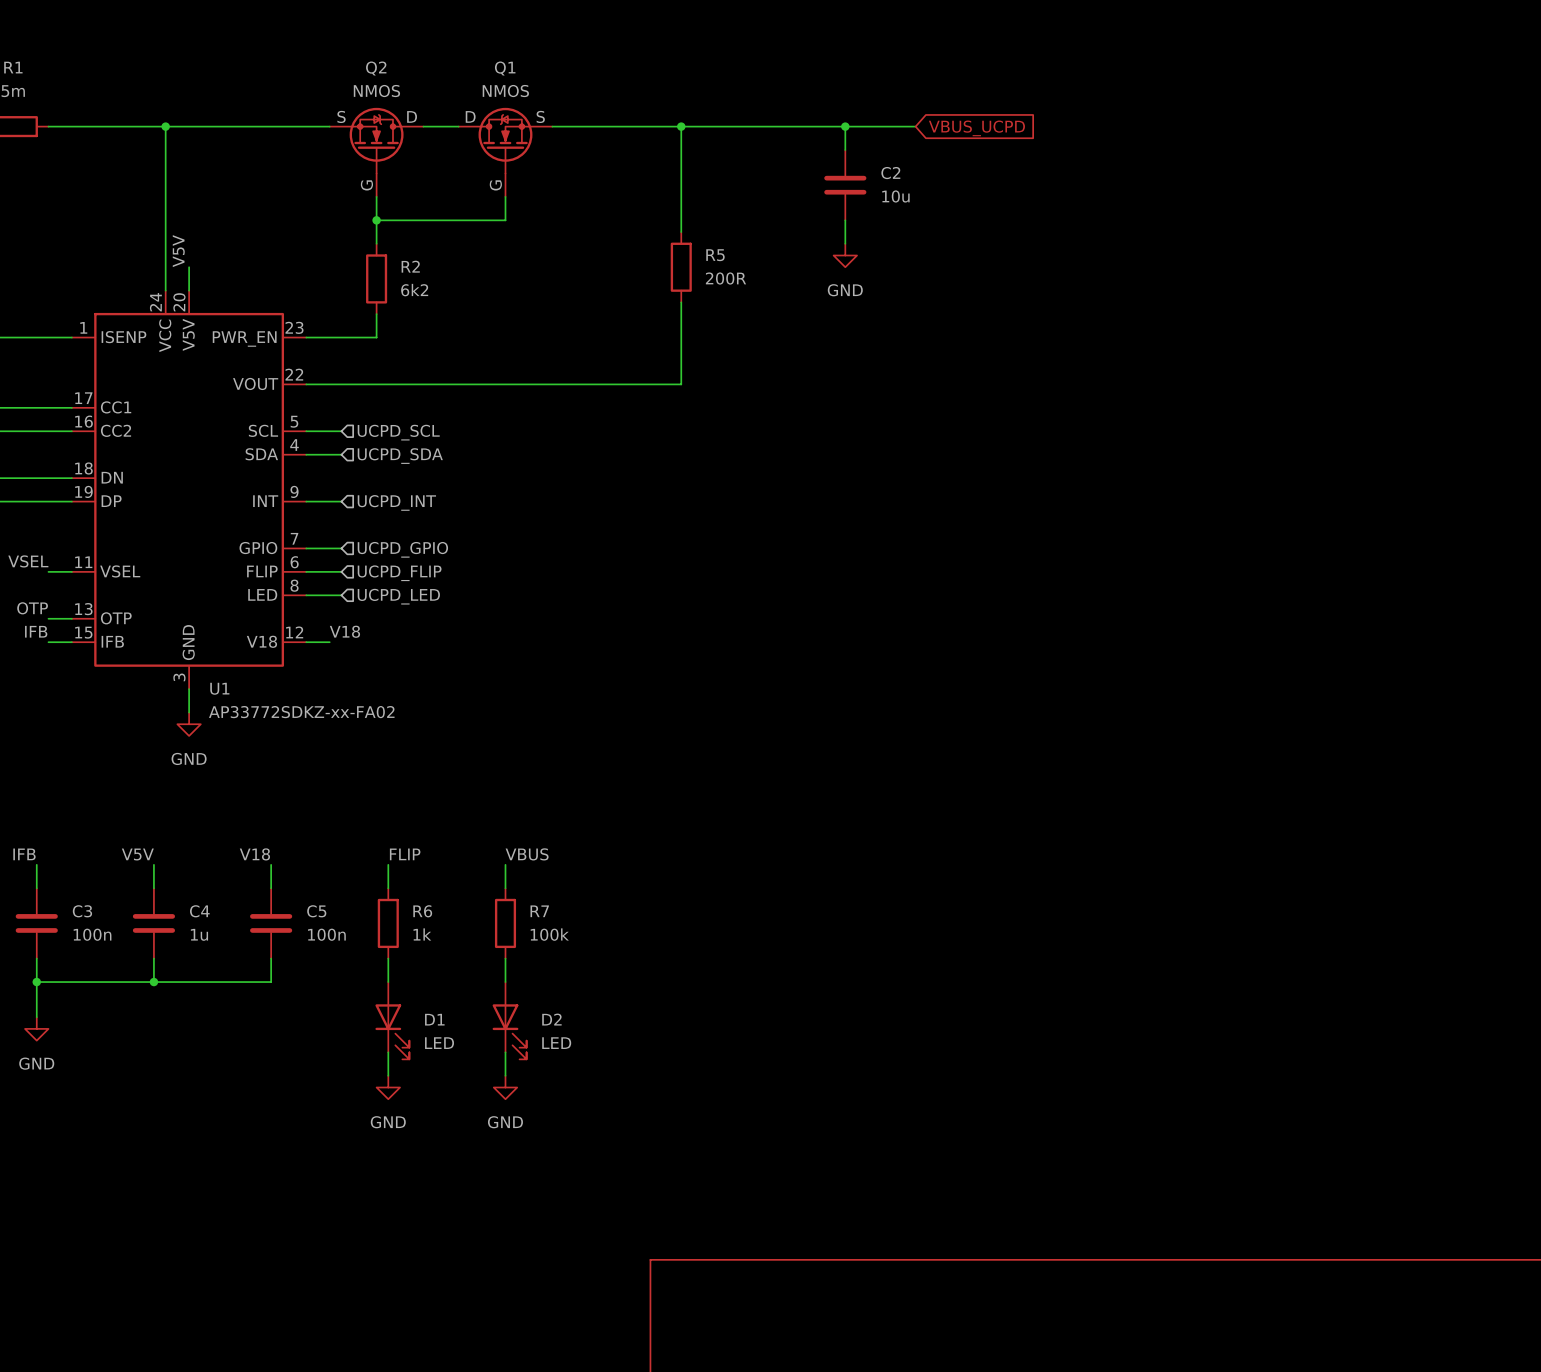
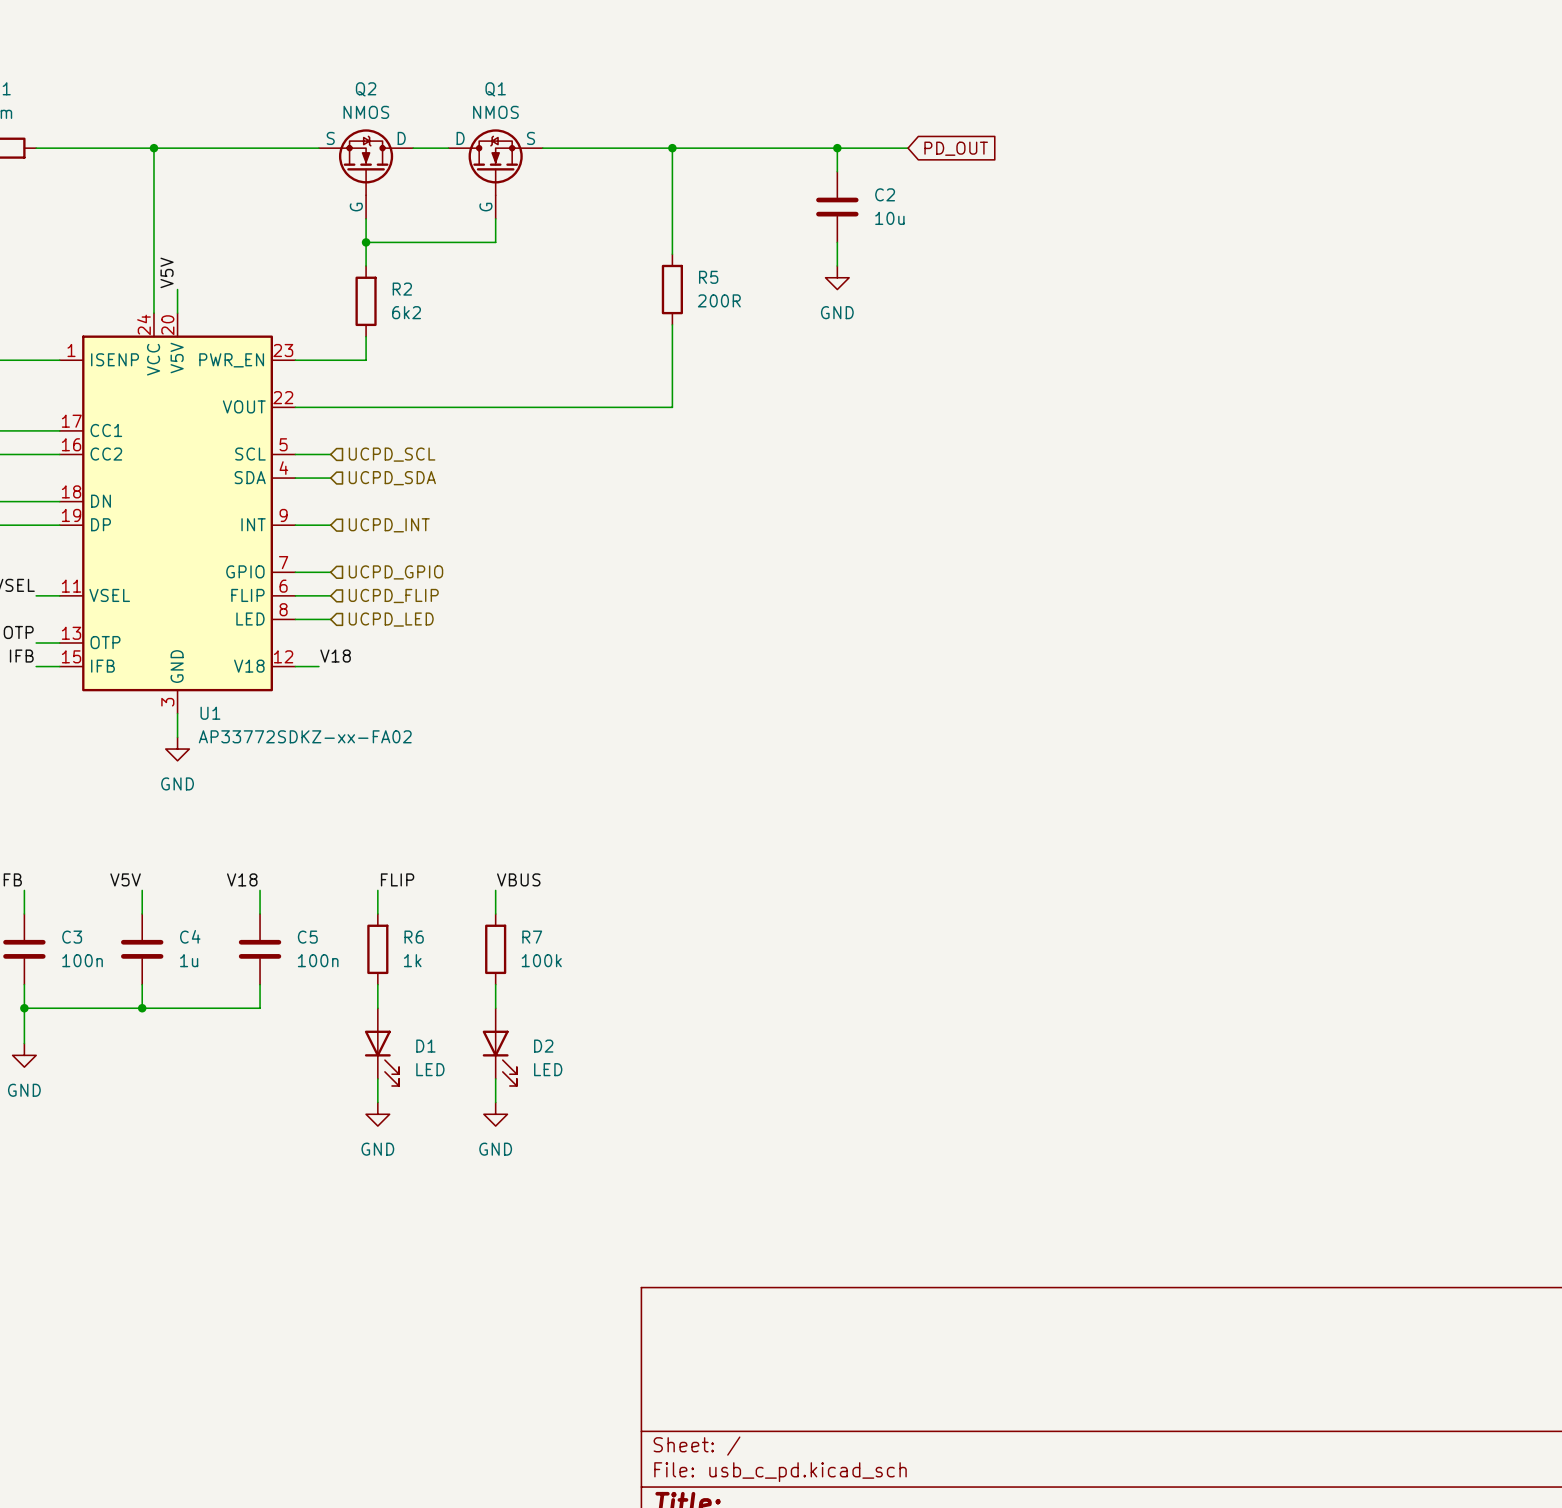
global label: VBUS_UCPD (976, 128) -> PD_OUT (956, 148)

